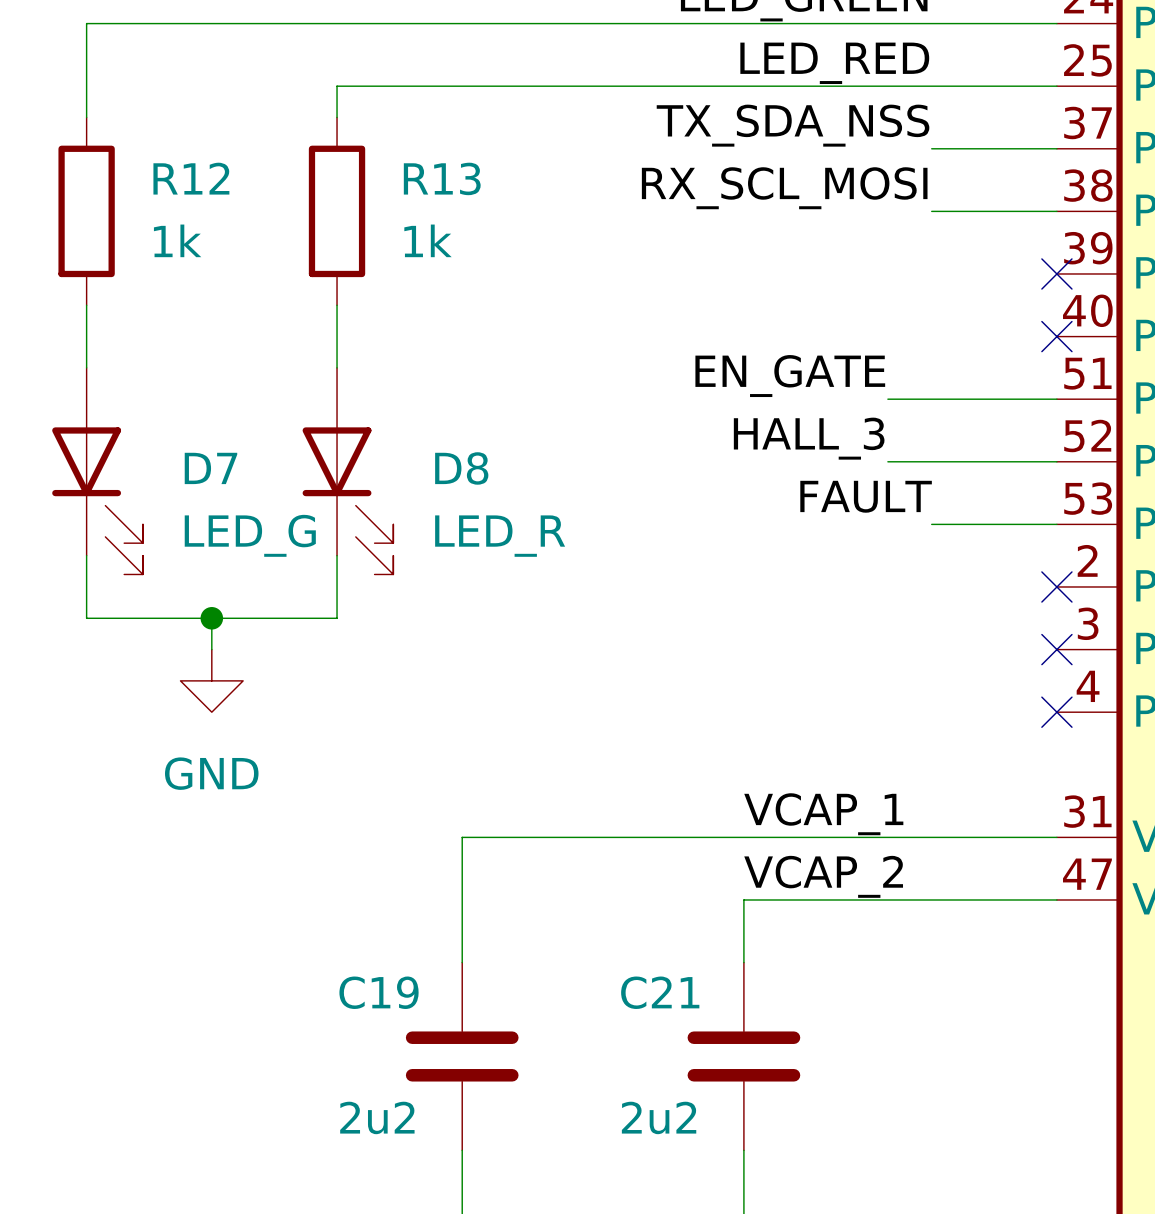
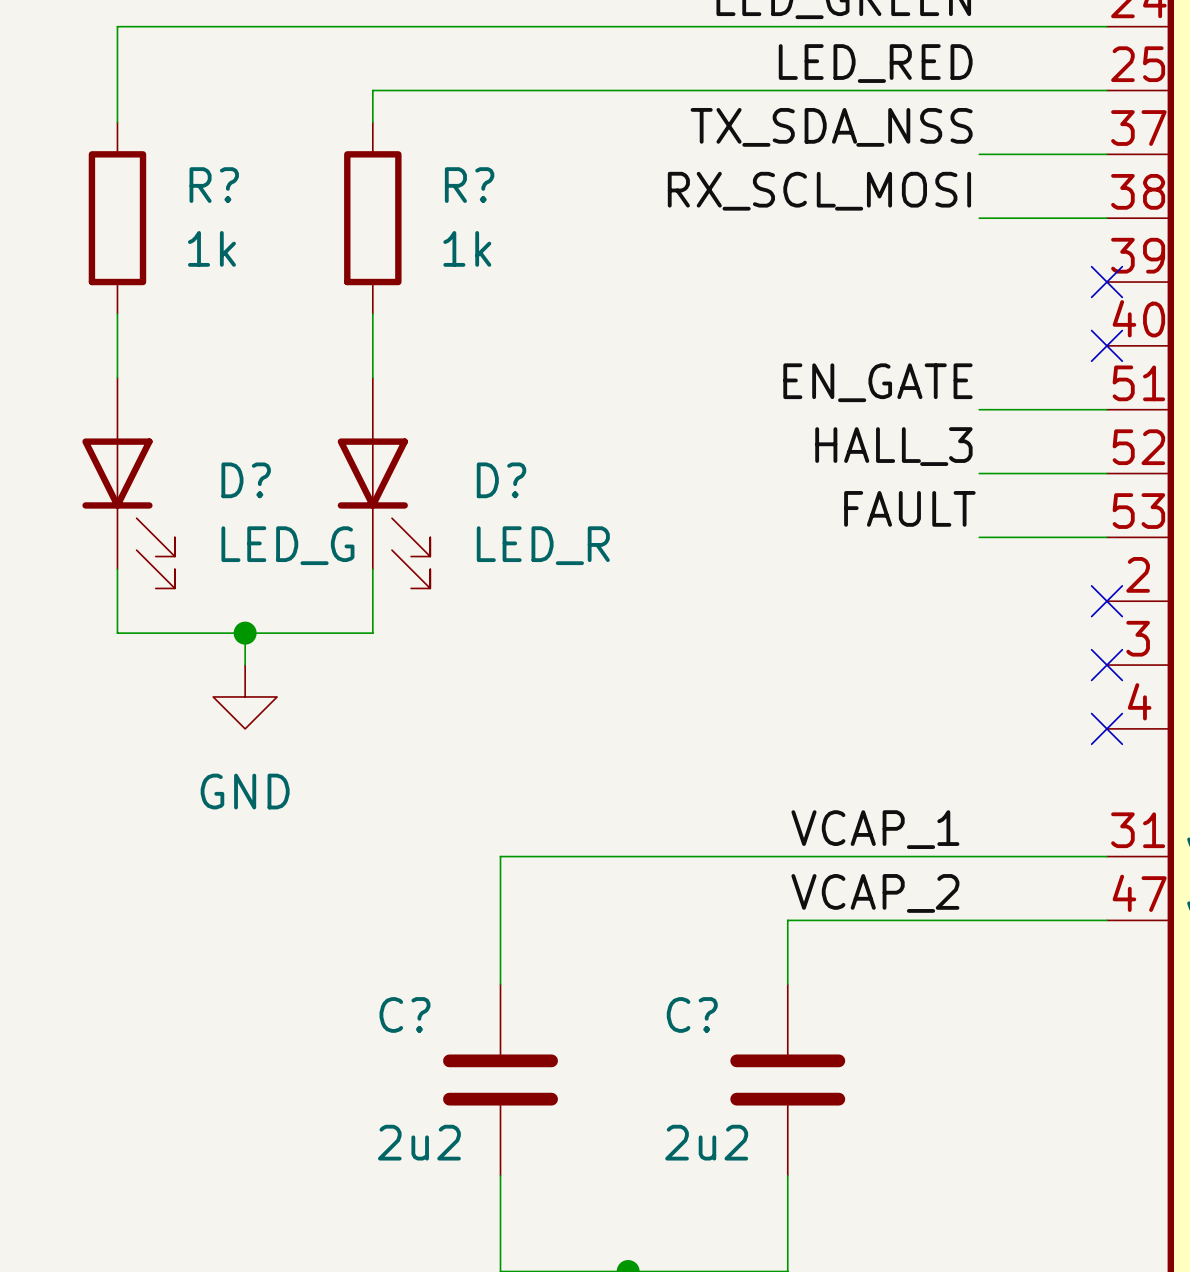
R12 name: R12 (191, 178) -> R? (214, 185)
R13 name: R13 (442, 178) -> R? (469, 185)
label position: EN_GATE (790, 376) -> EN_GATE (877, 382)
wire: (887, 399) (931, 399) -> none
label position: HALL_3 (809, 438) -> HALL_3 (893, 446)
wire: (887, 461) (931, 461) -> none
D7 name: D7 (210, 468) -> D? (246, 480)
D8 name: D8 (461, 468) -> D? (501, 480)
C19 name: C19 (379, 992) -> C? (404, 1014)
C21 name: C21 (660, 992) -> C? (692, 1014)

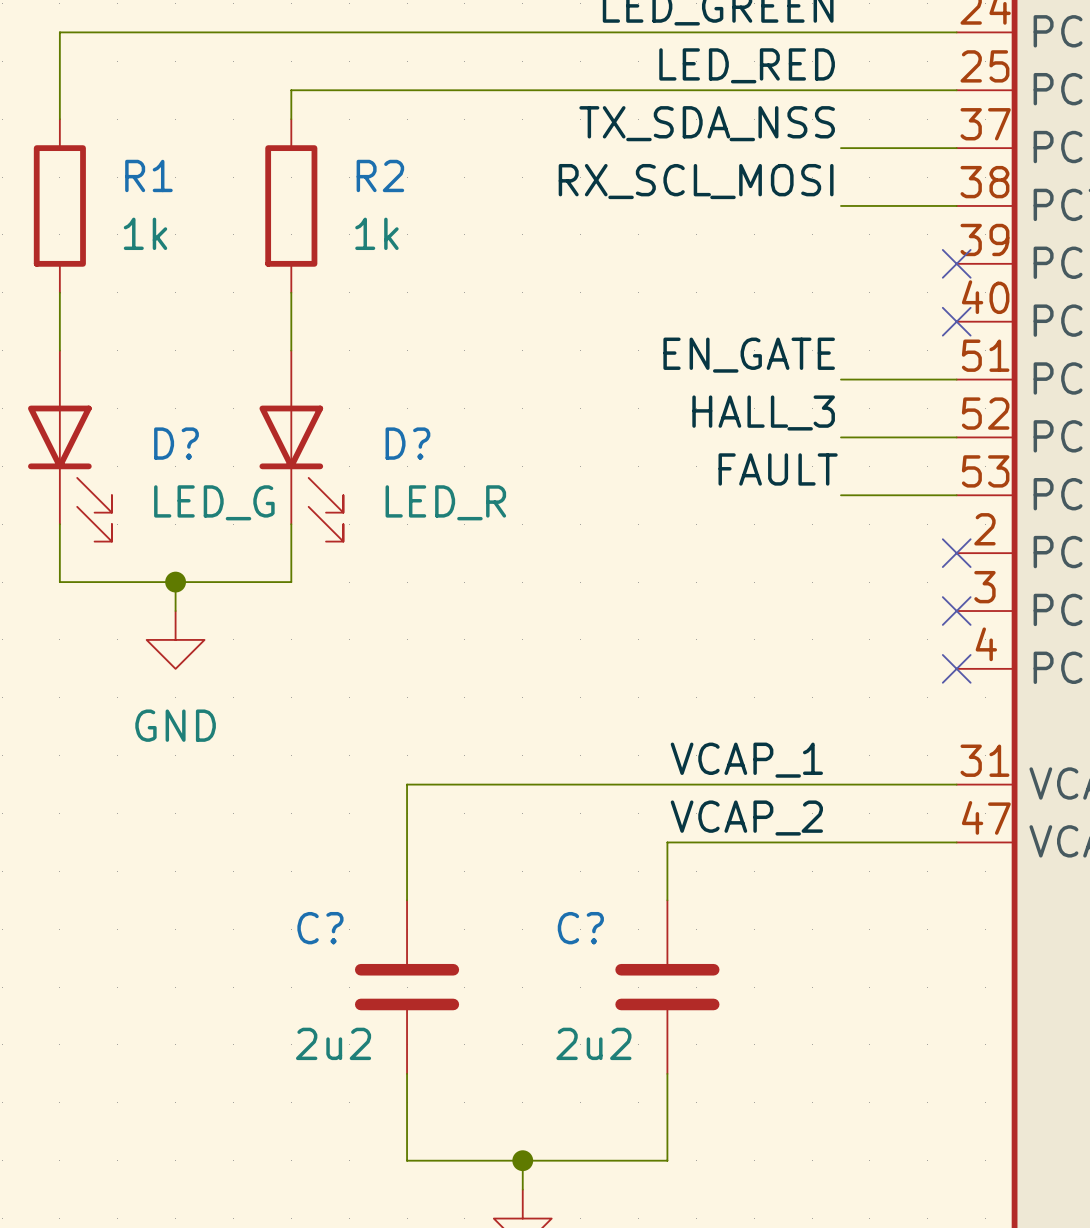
R? name: R? (214, 185) -> R1 (148, 175)
R? name: R? (469, 185) -> R2 (380, 175)

